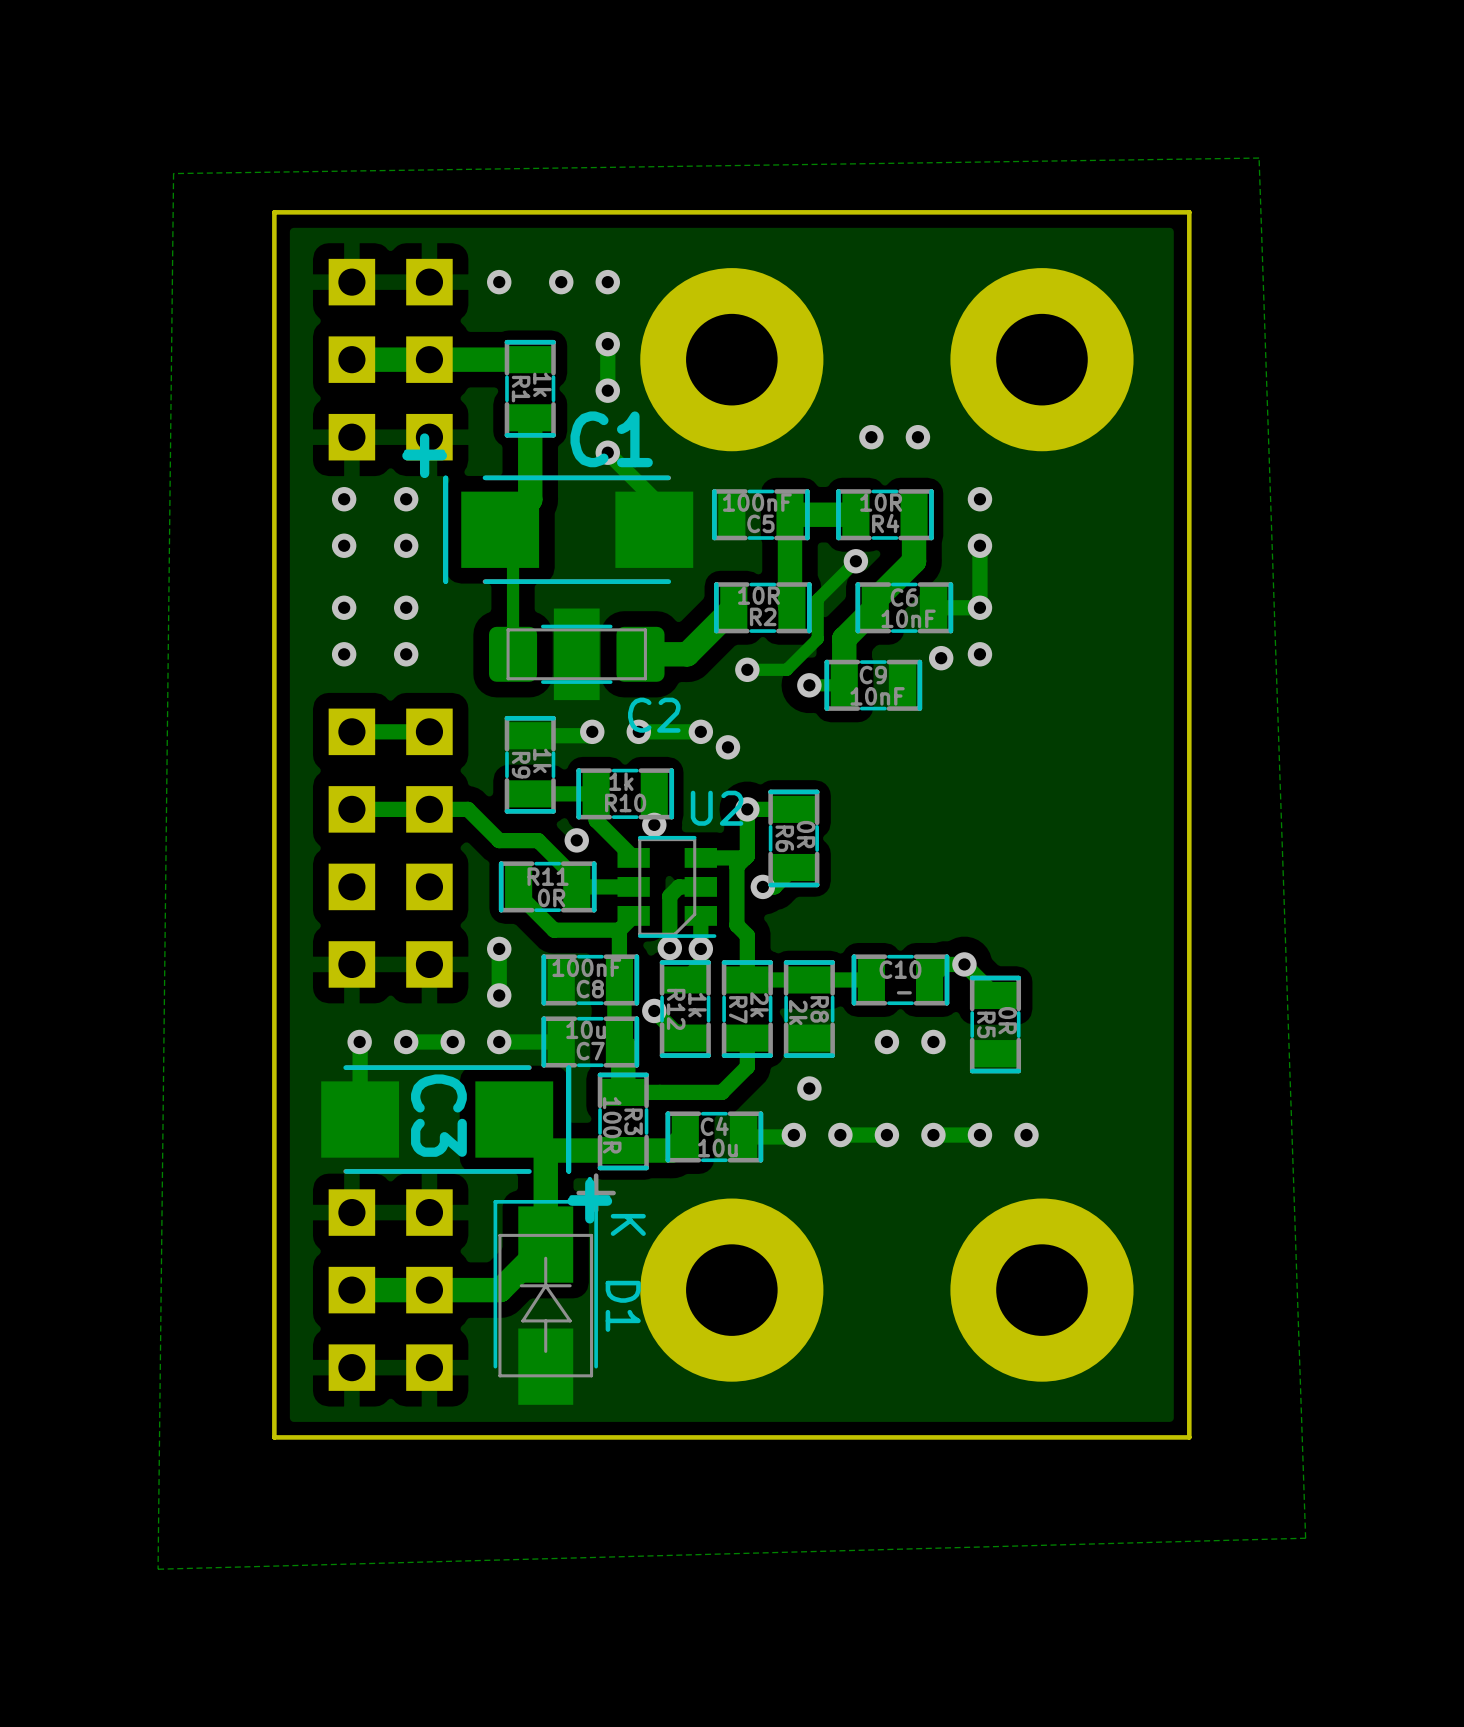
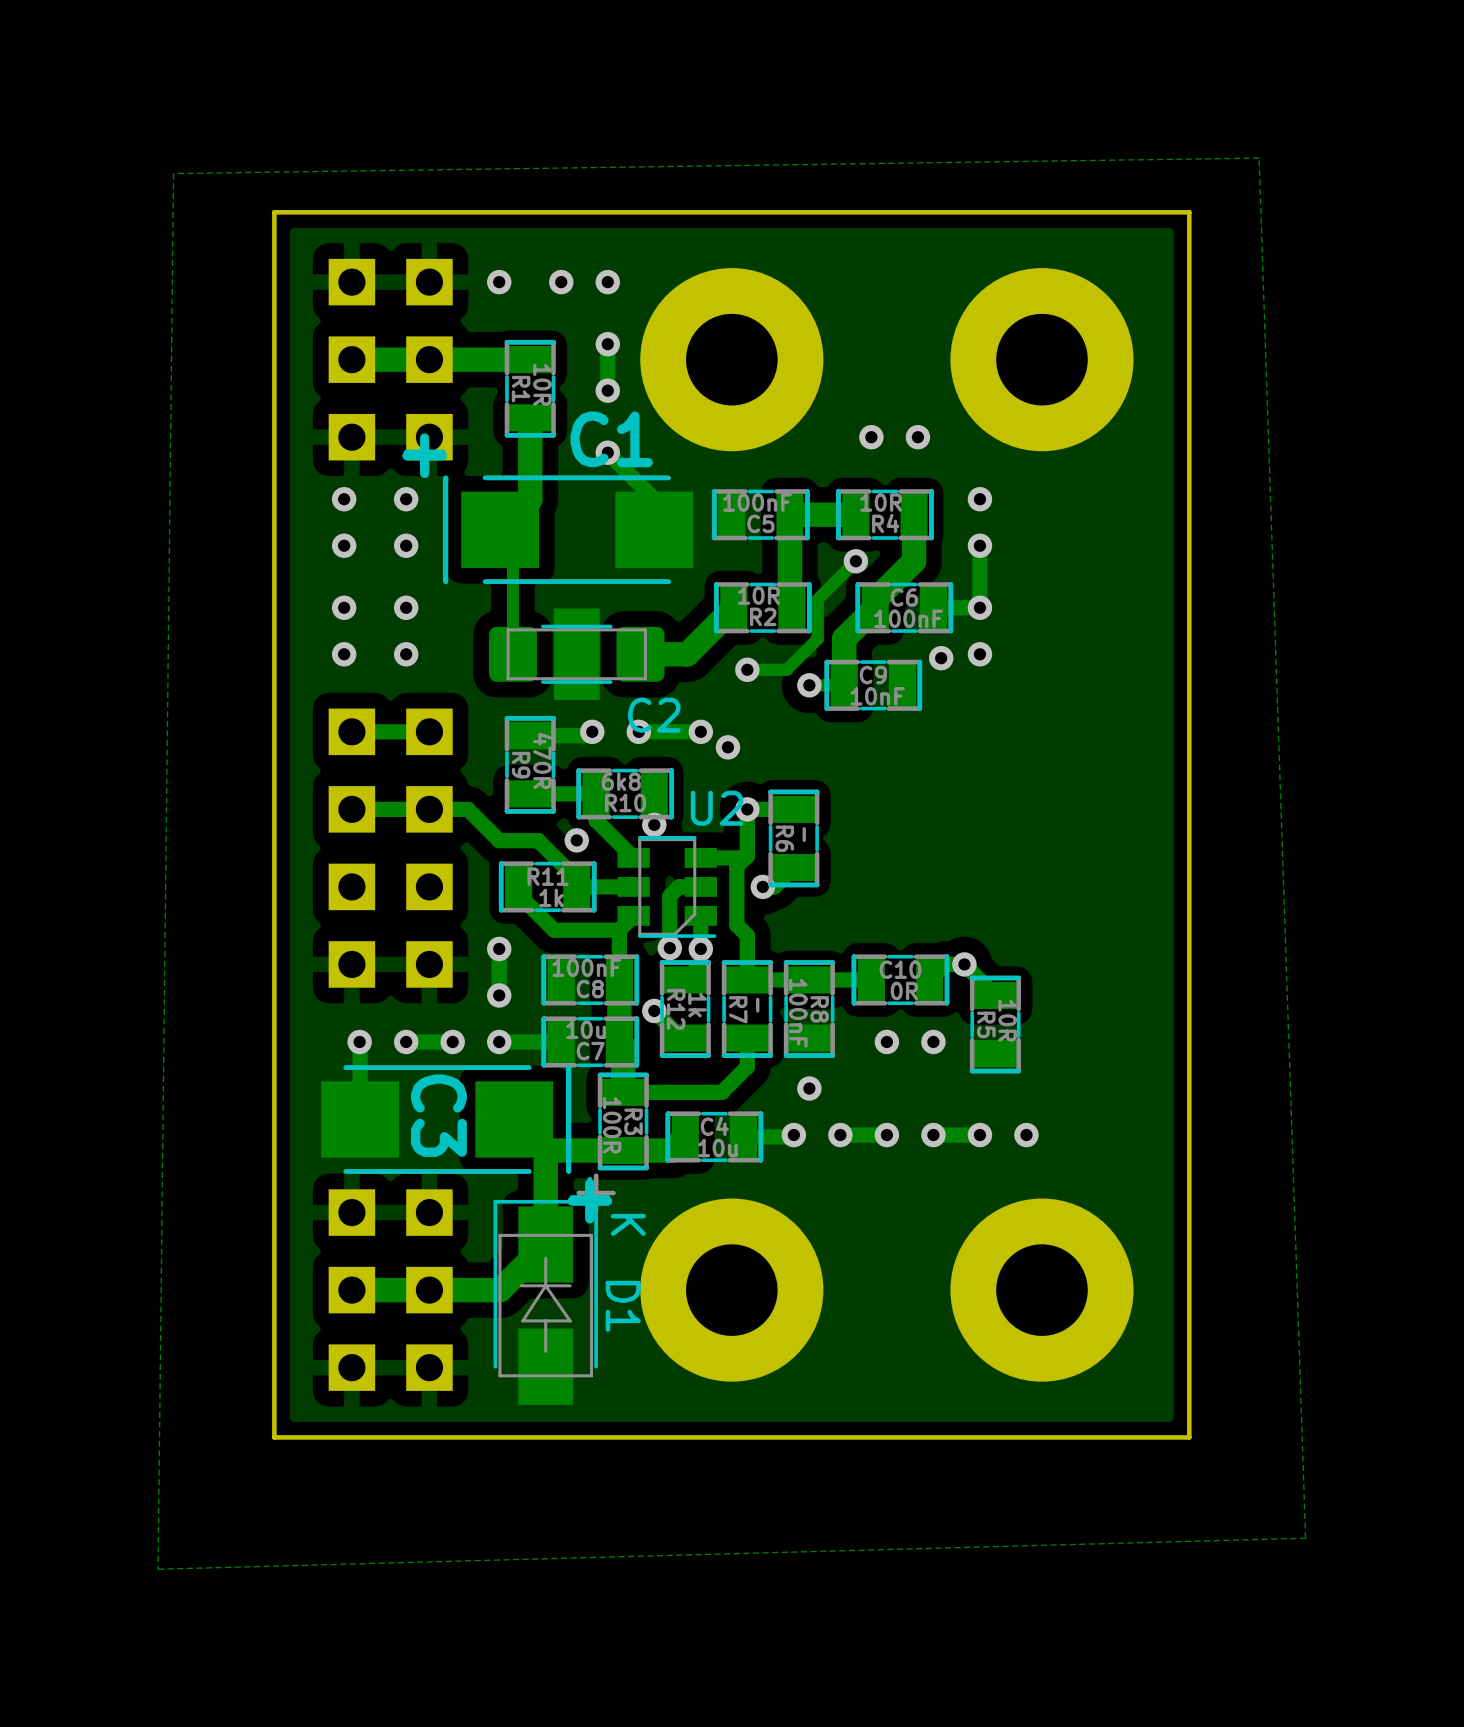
R1 value: 1k (542, 384) -> 10R (542, 384)
C6 value: 10nF (908, 618) -> 100nF (908, 618)
R9 value: 1k (542, 760) -> 470R (542, 760)
R10 value: 1k (621, 781) -> 6k8 (621, 781)
R6 value: 0R (806, 834) -> - (804, 834)
R11 value: 0R (551, 897) -> 1k (551, 897)
C10 value: - (904, 992) -> 0R (904, 991)
R7 value: 2k (759, 1004) -> - (757, 1005)
R8 value: 2k (798, 1012) -> 100nF (798, 1013)
R5 value: 0R (1007, 1020) -> 10R (1007, 1020)

